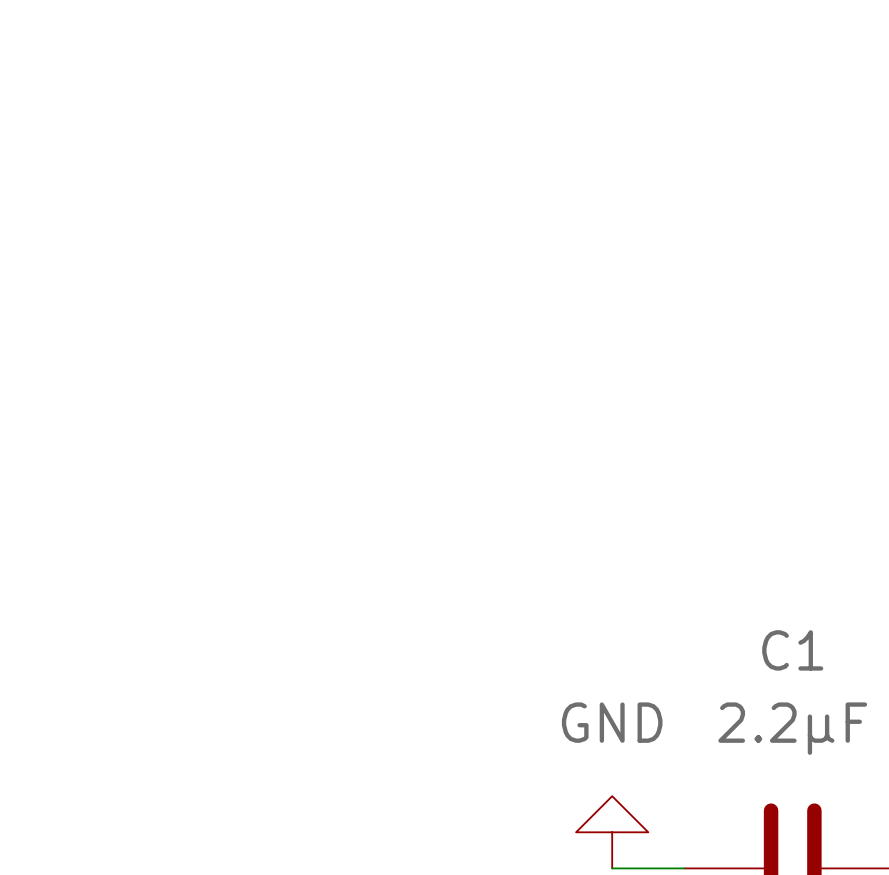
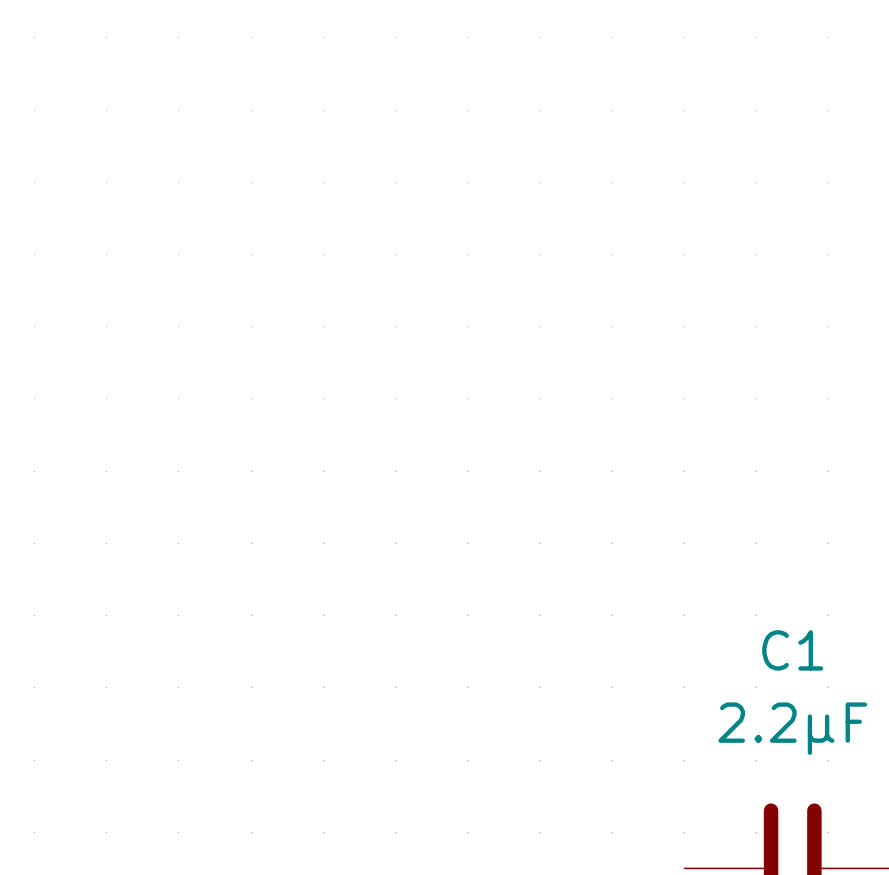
power symbol: GND (612, 832) -> none
wire: (612, 868) (684, 868) -> none

